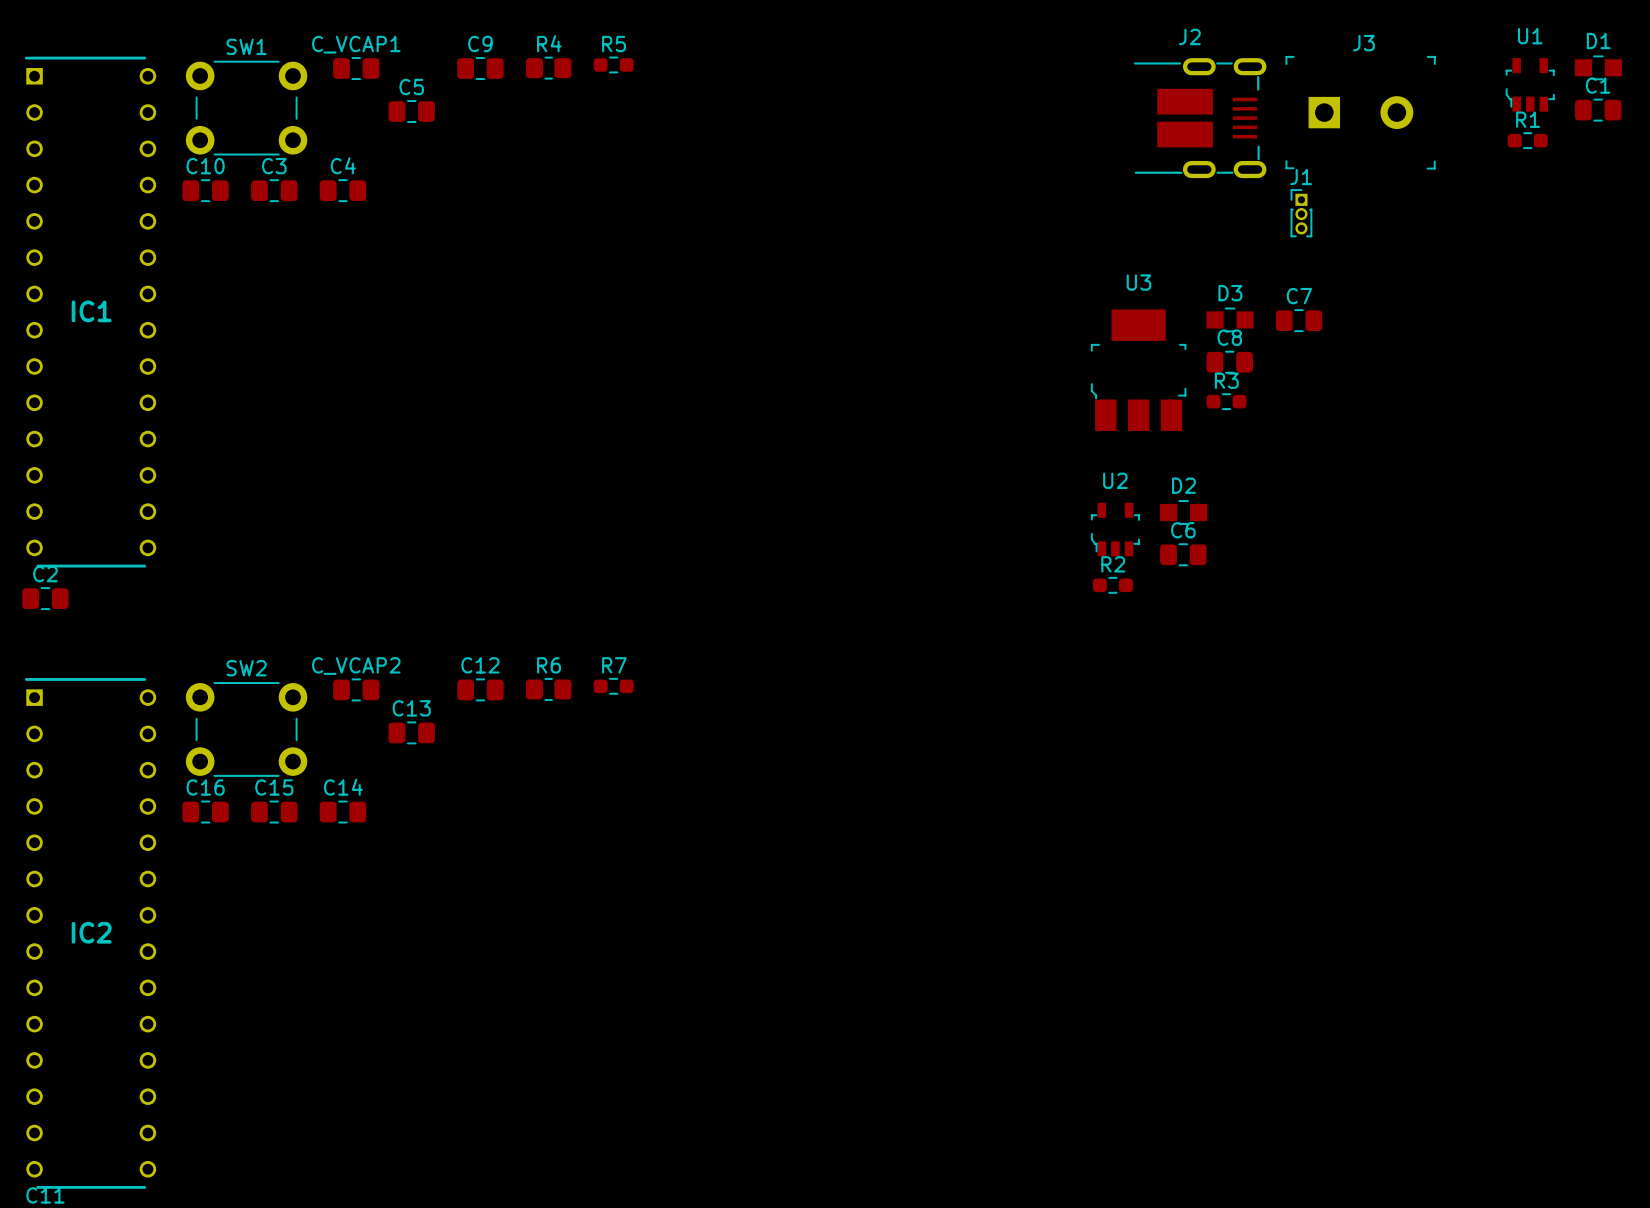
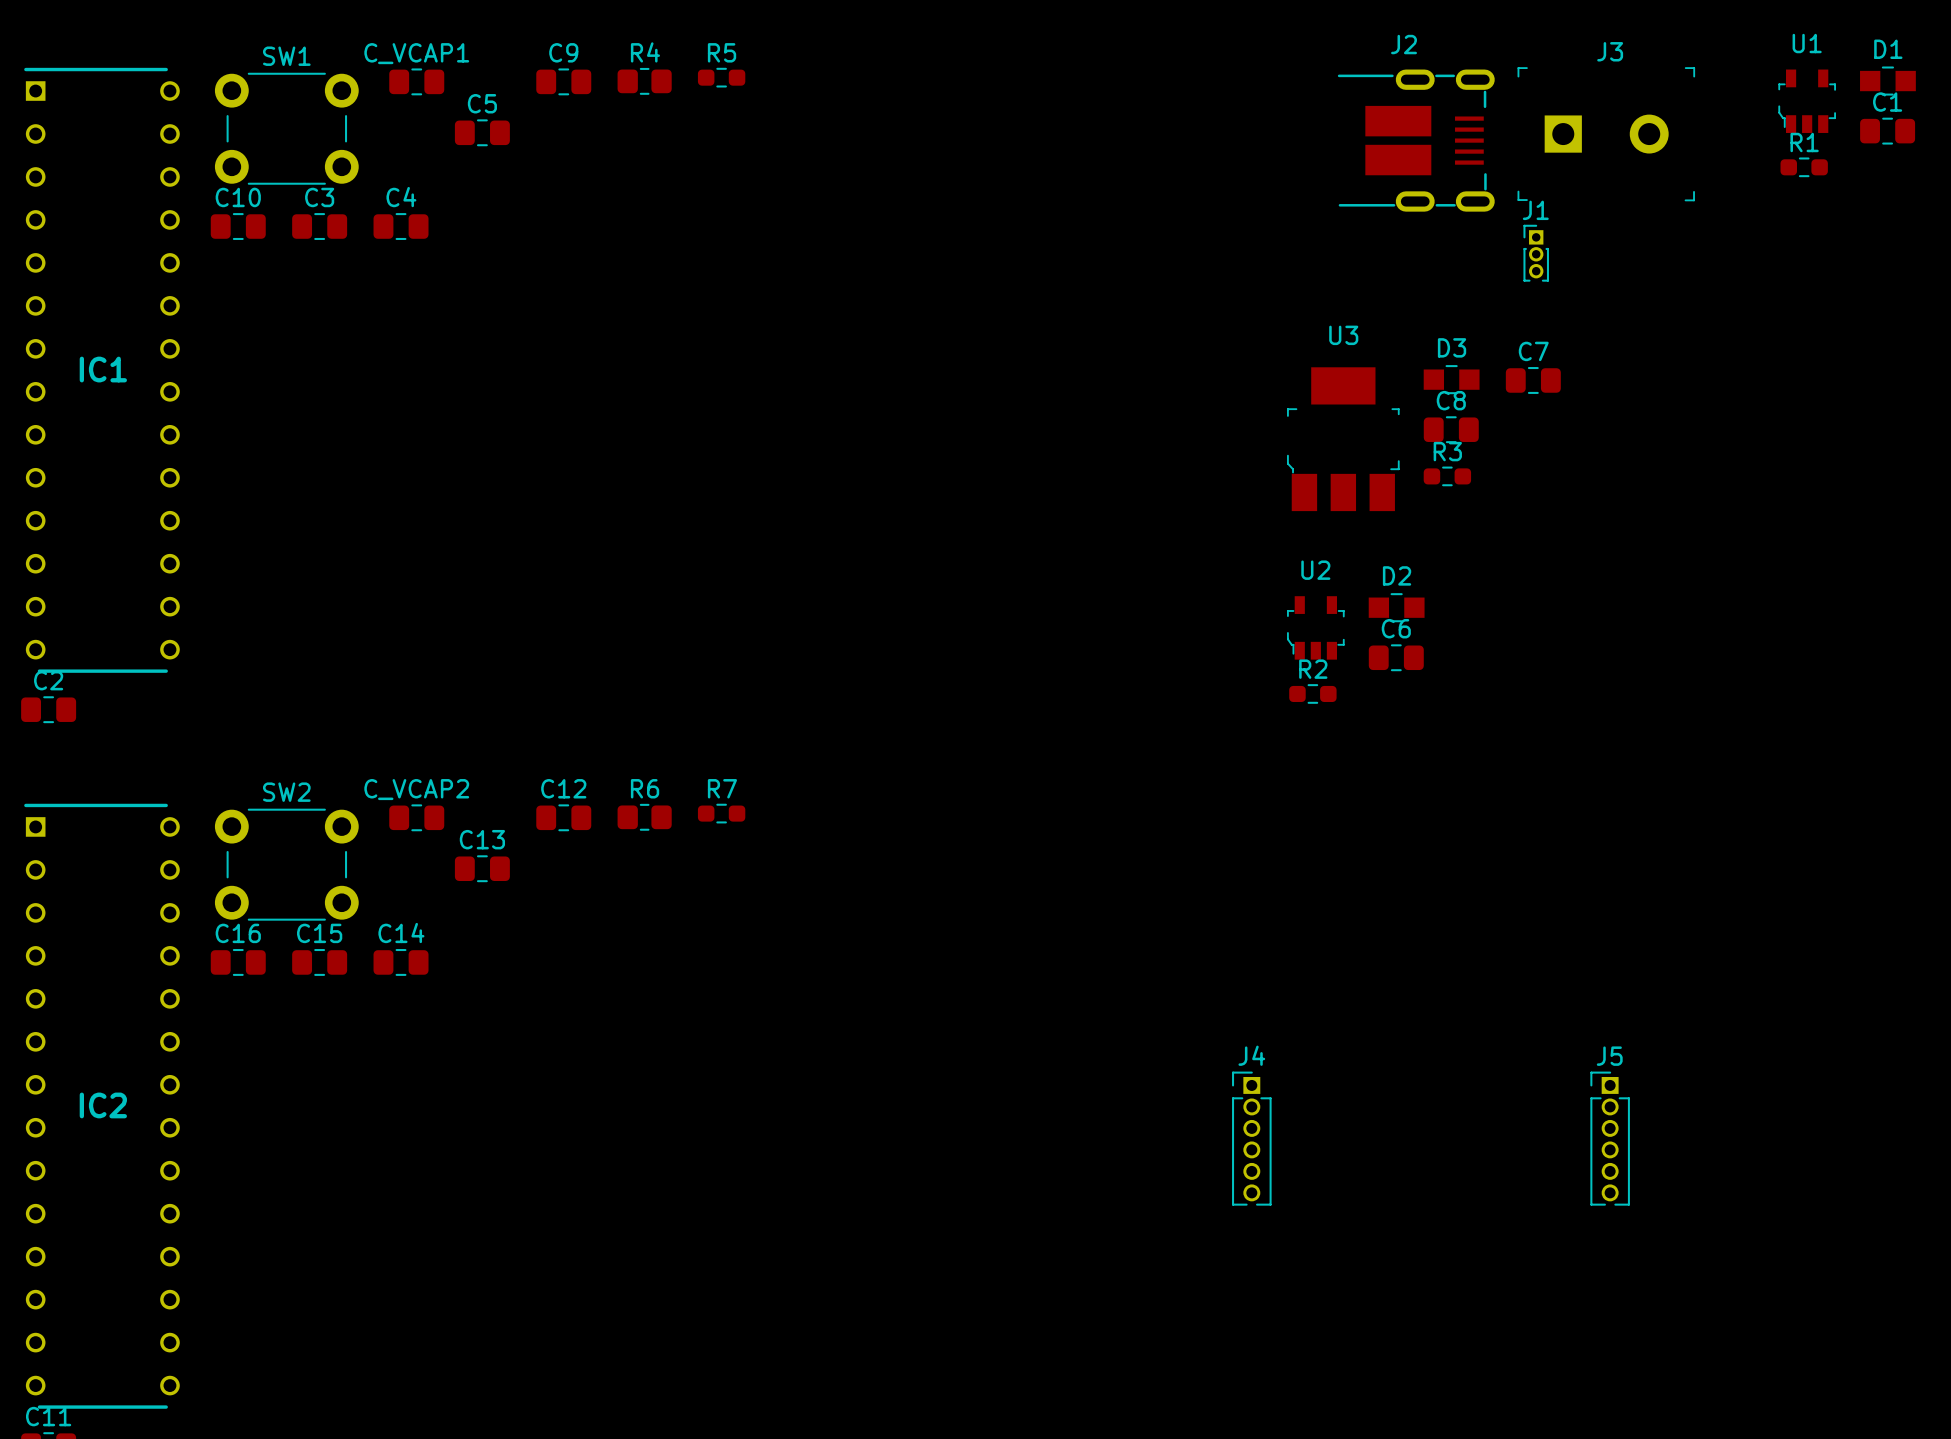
J4: none -> (1251, 1138)
J5: none -> (1610, 1138)

